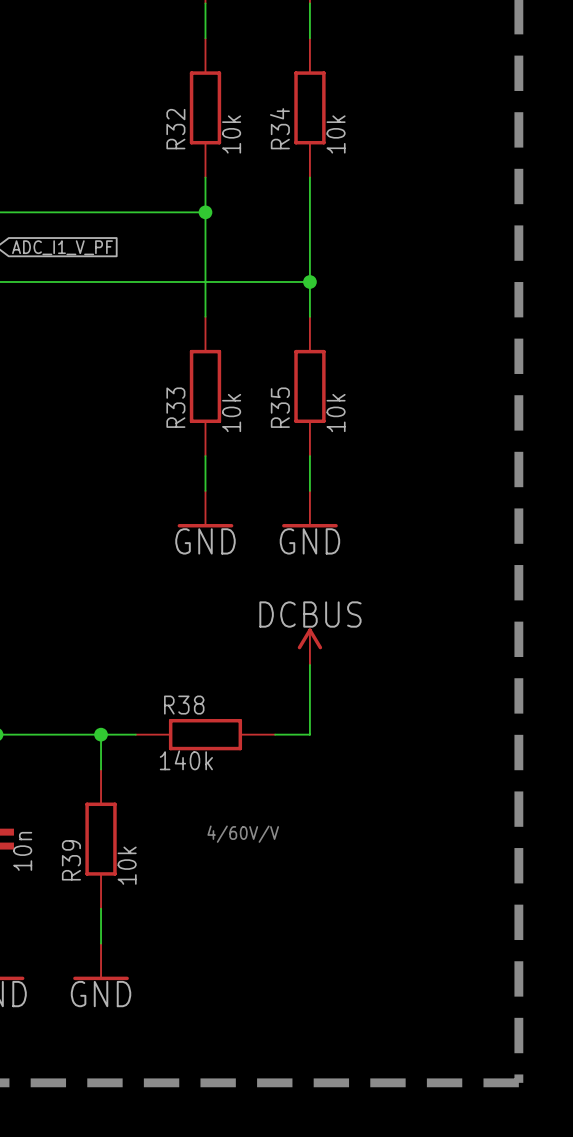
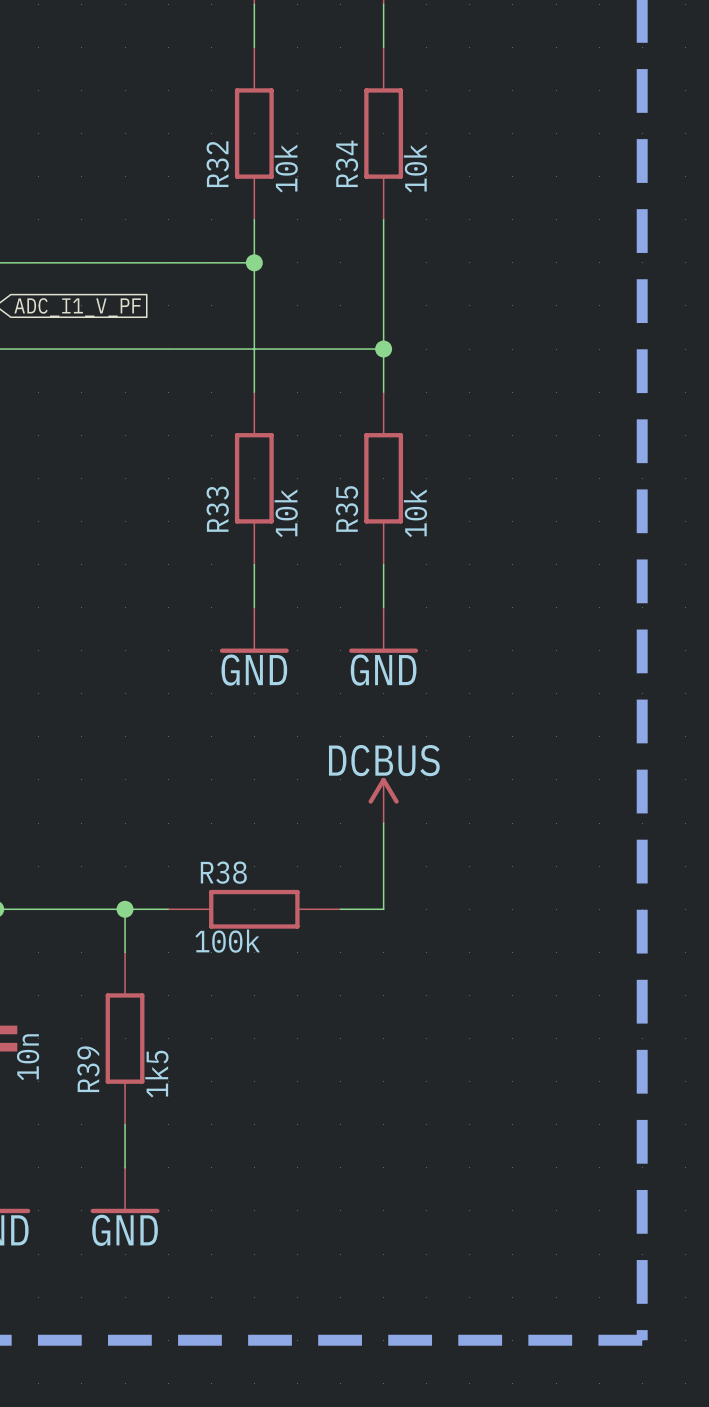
R38 value: 140k (186, 760) -> 100k (227, 941)
text: 4/60V/V (243, 834) -> none
R39 value: 10k (127, 865) -> 1k5 (156, 1074)

